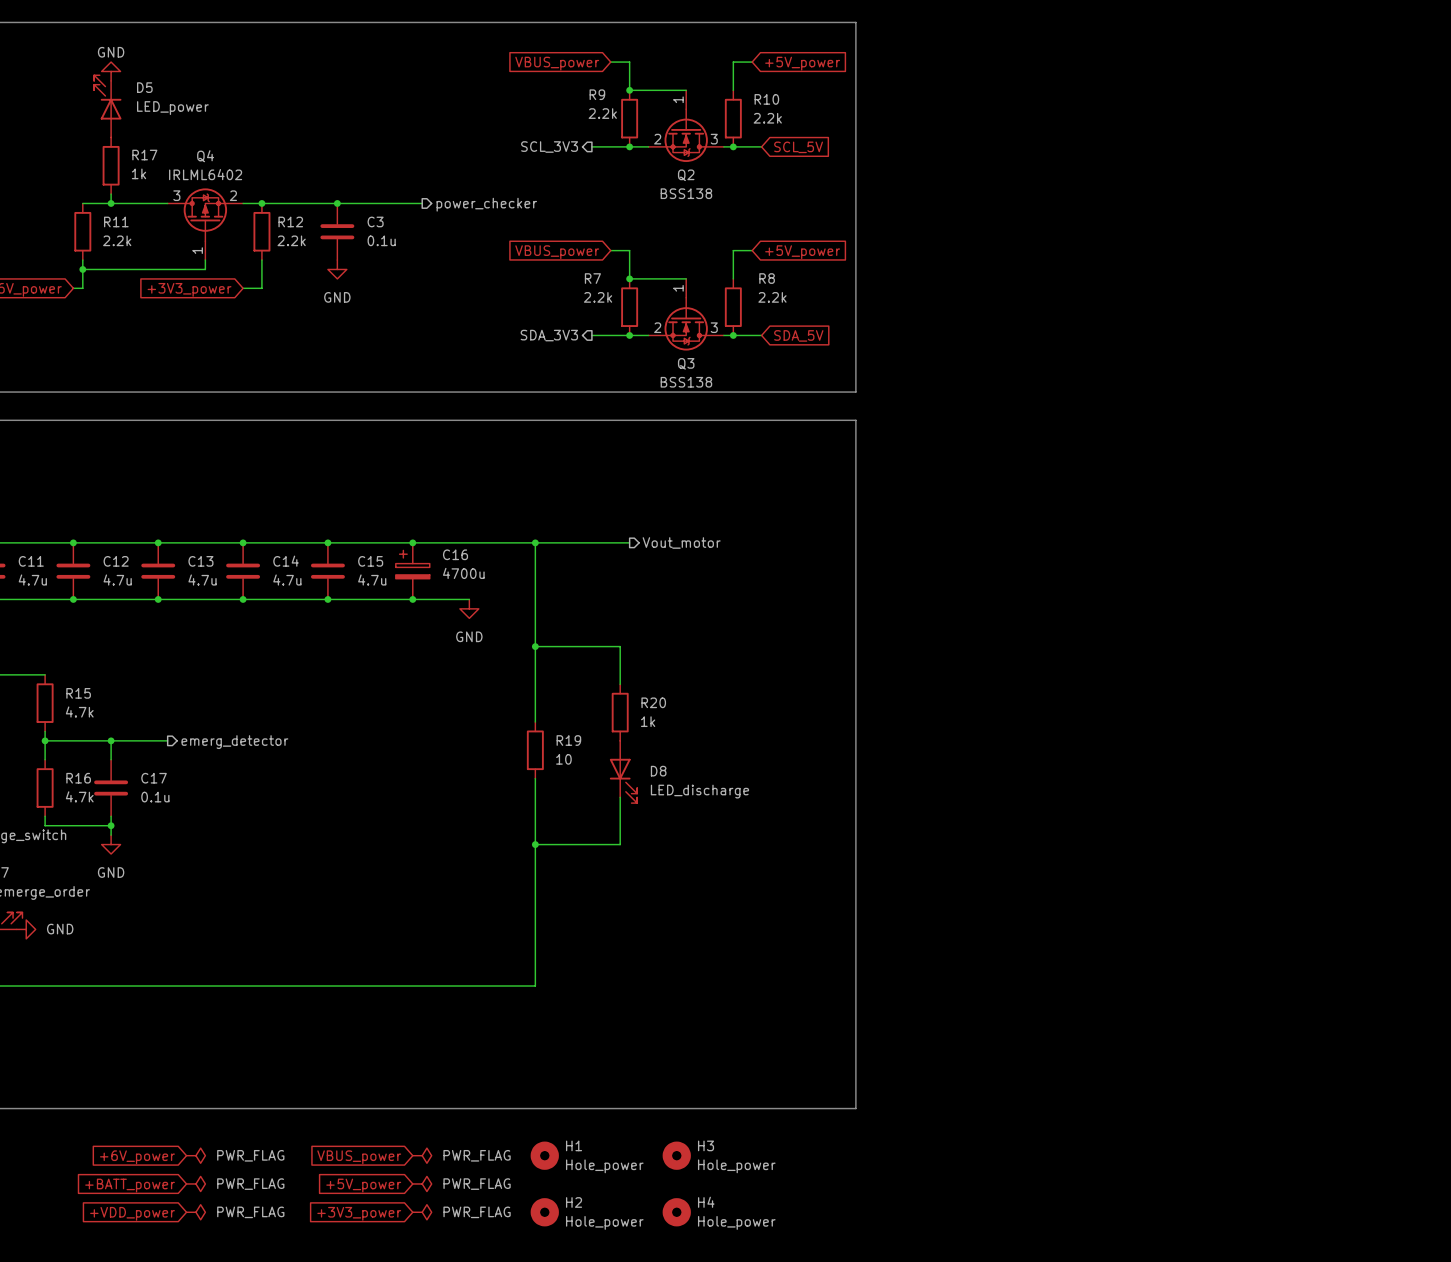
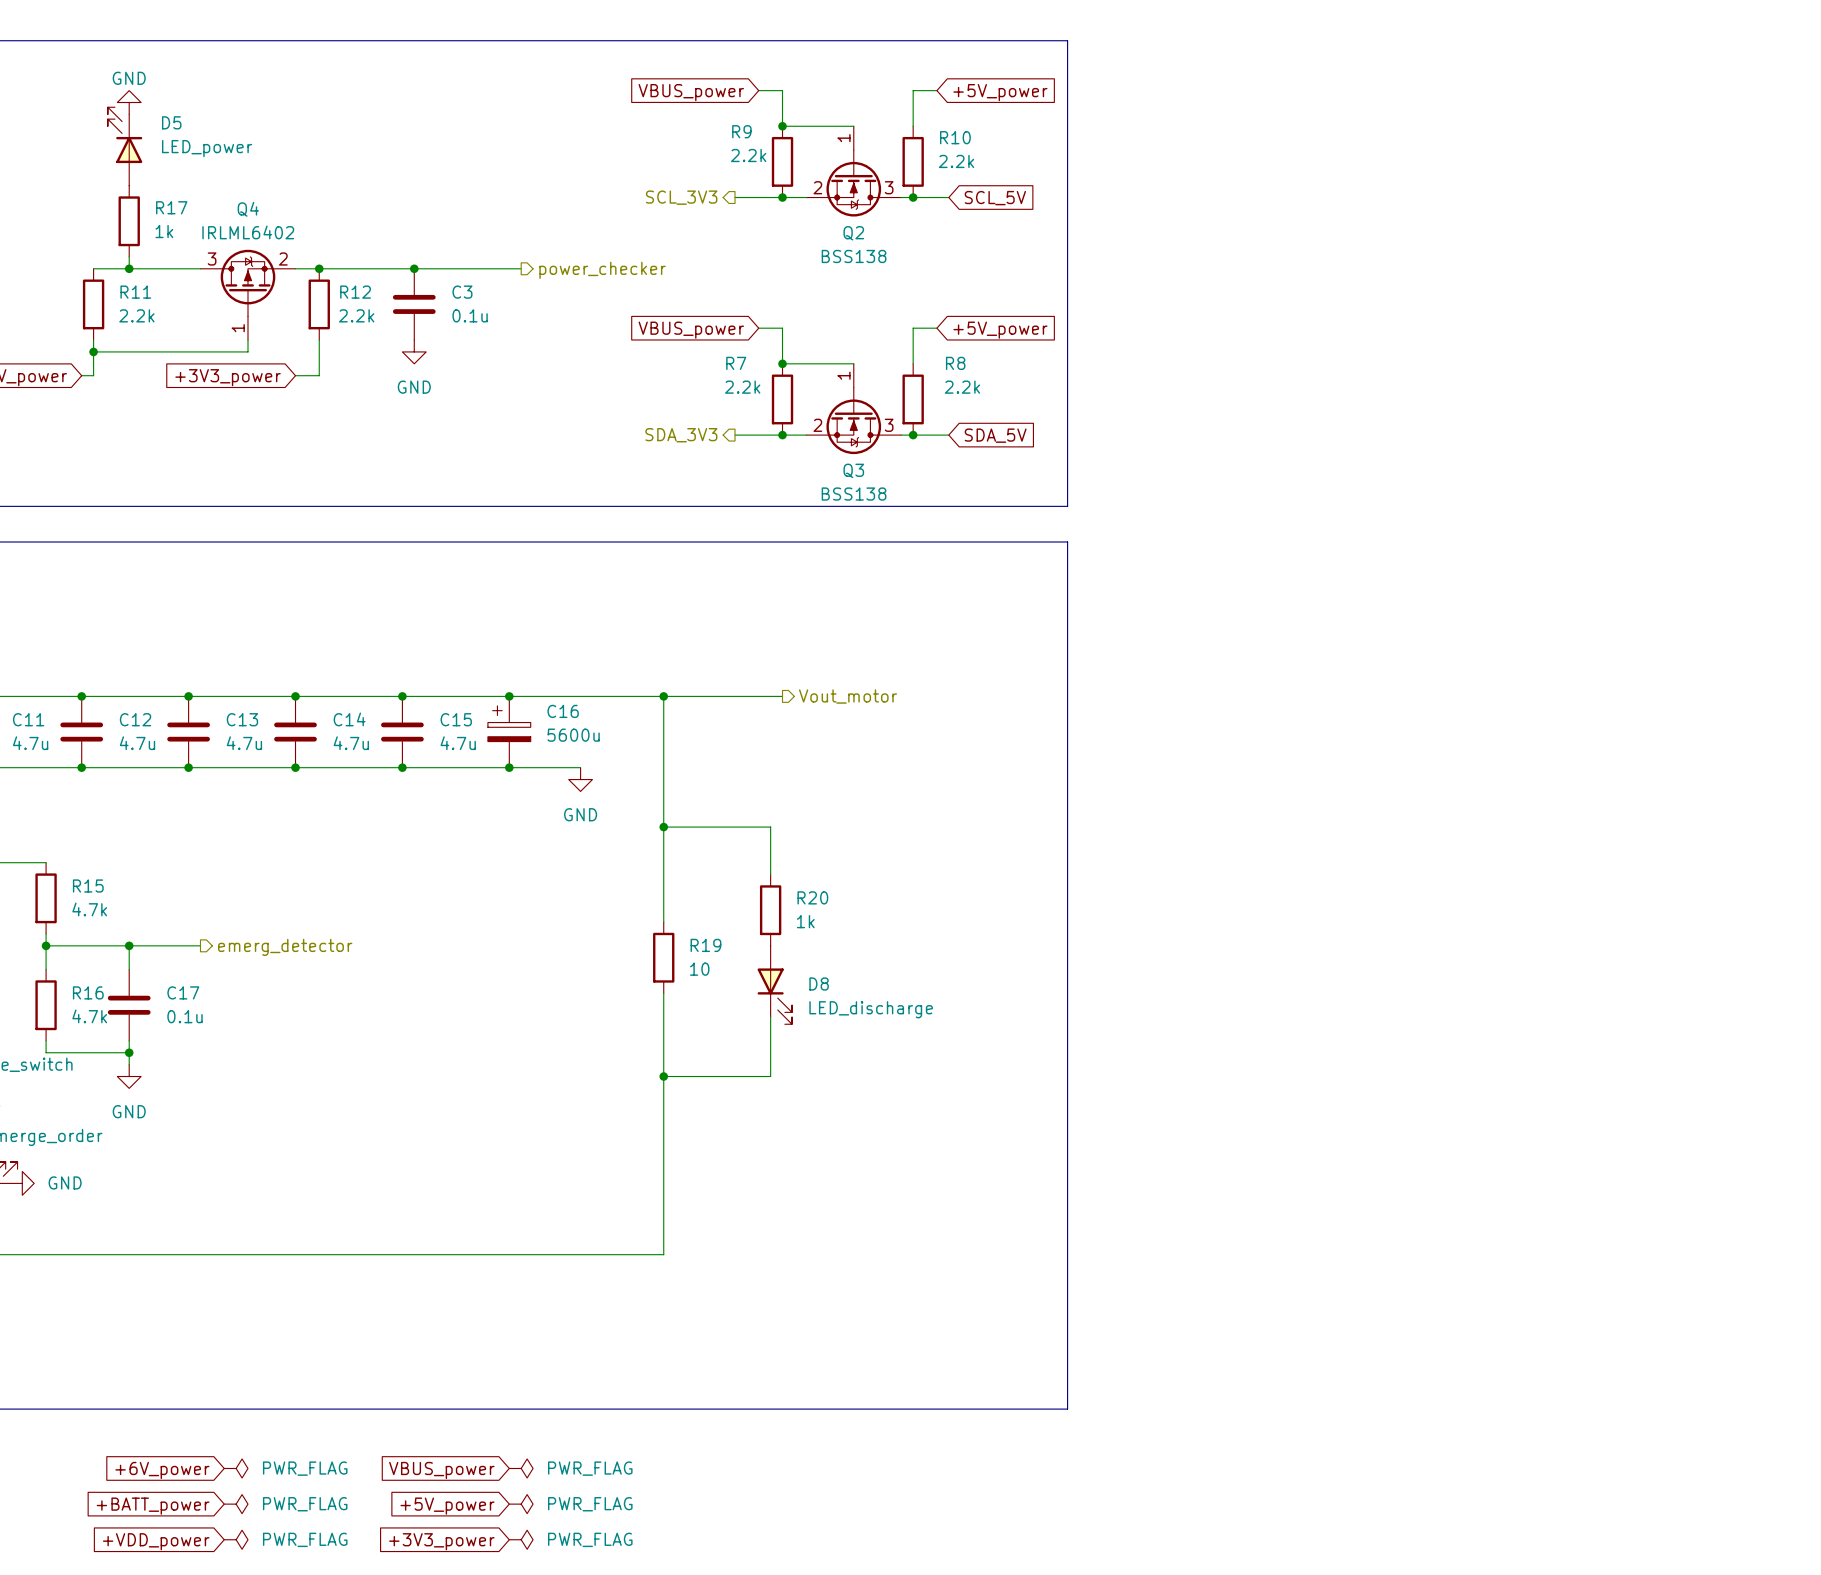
C16 value: 4700u (463, 573) -> 5600u (573, 735)
H1: Hole_power (544, 1155) -> none
H3: Hole_power (676, 1155) -> none
H2: Hole_power (544, 1212) -> none
H4: Hole_power (676, 1212) -> none

